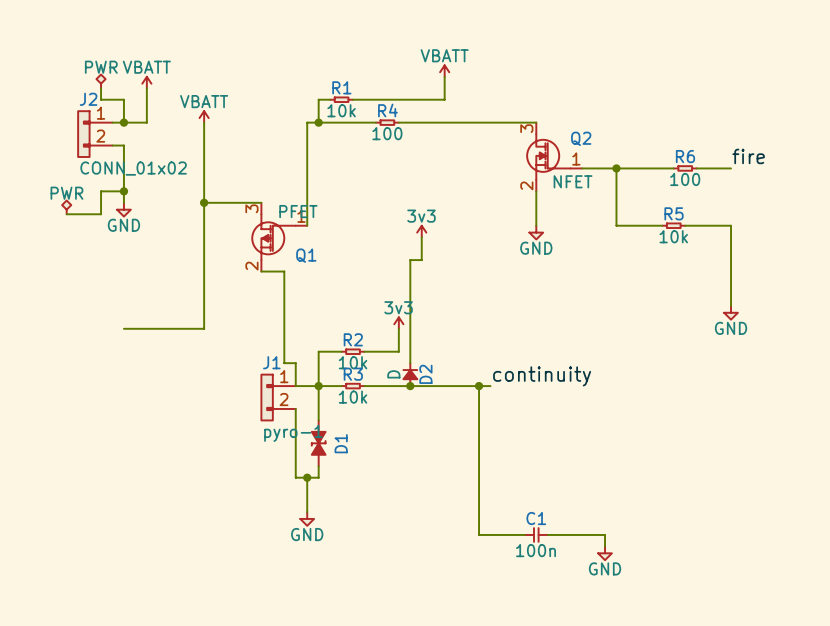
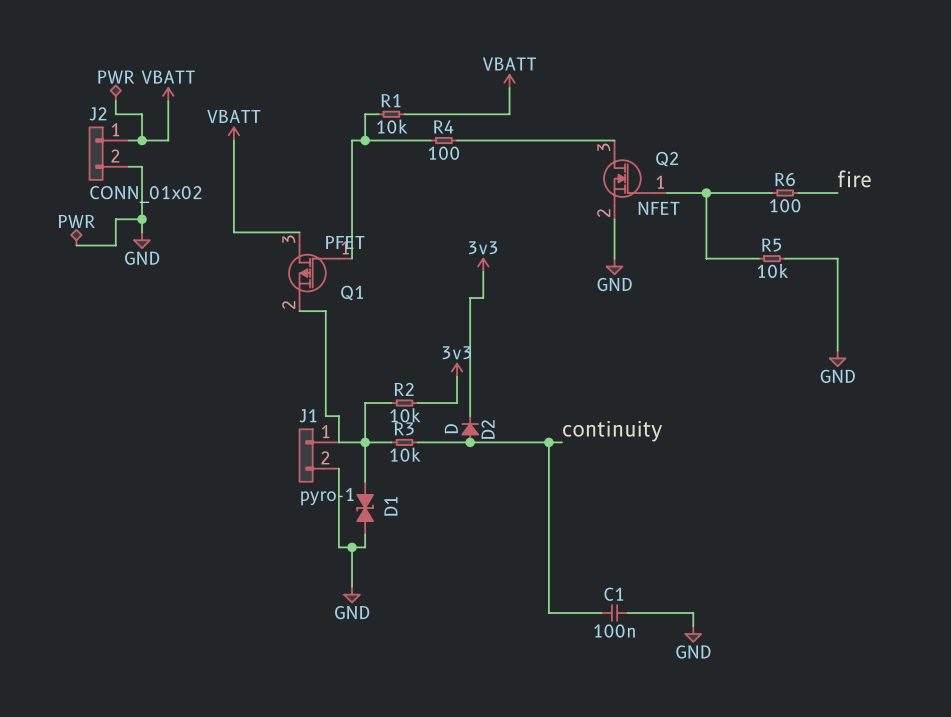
wire: (204, 202) (204, 328) (123, 328) -> none
junction: (204, 202) -> none

